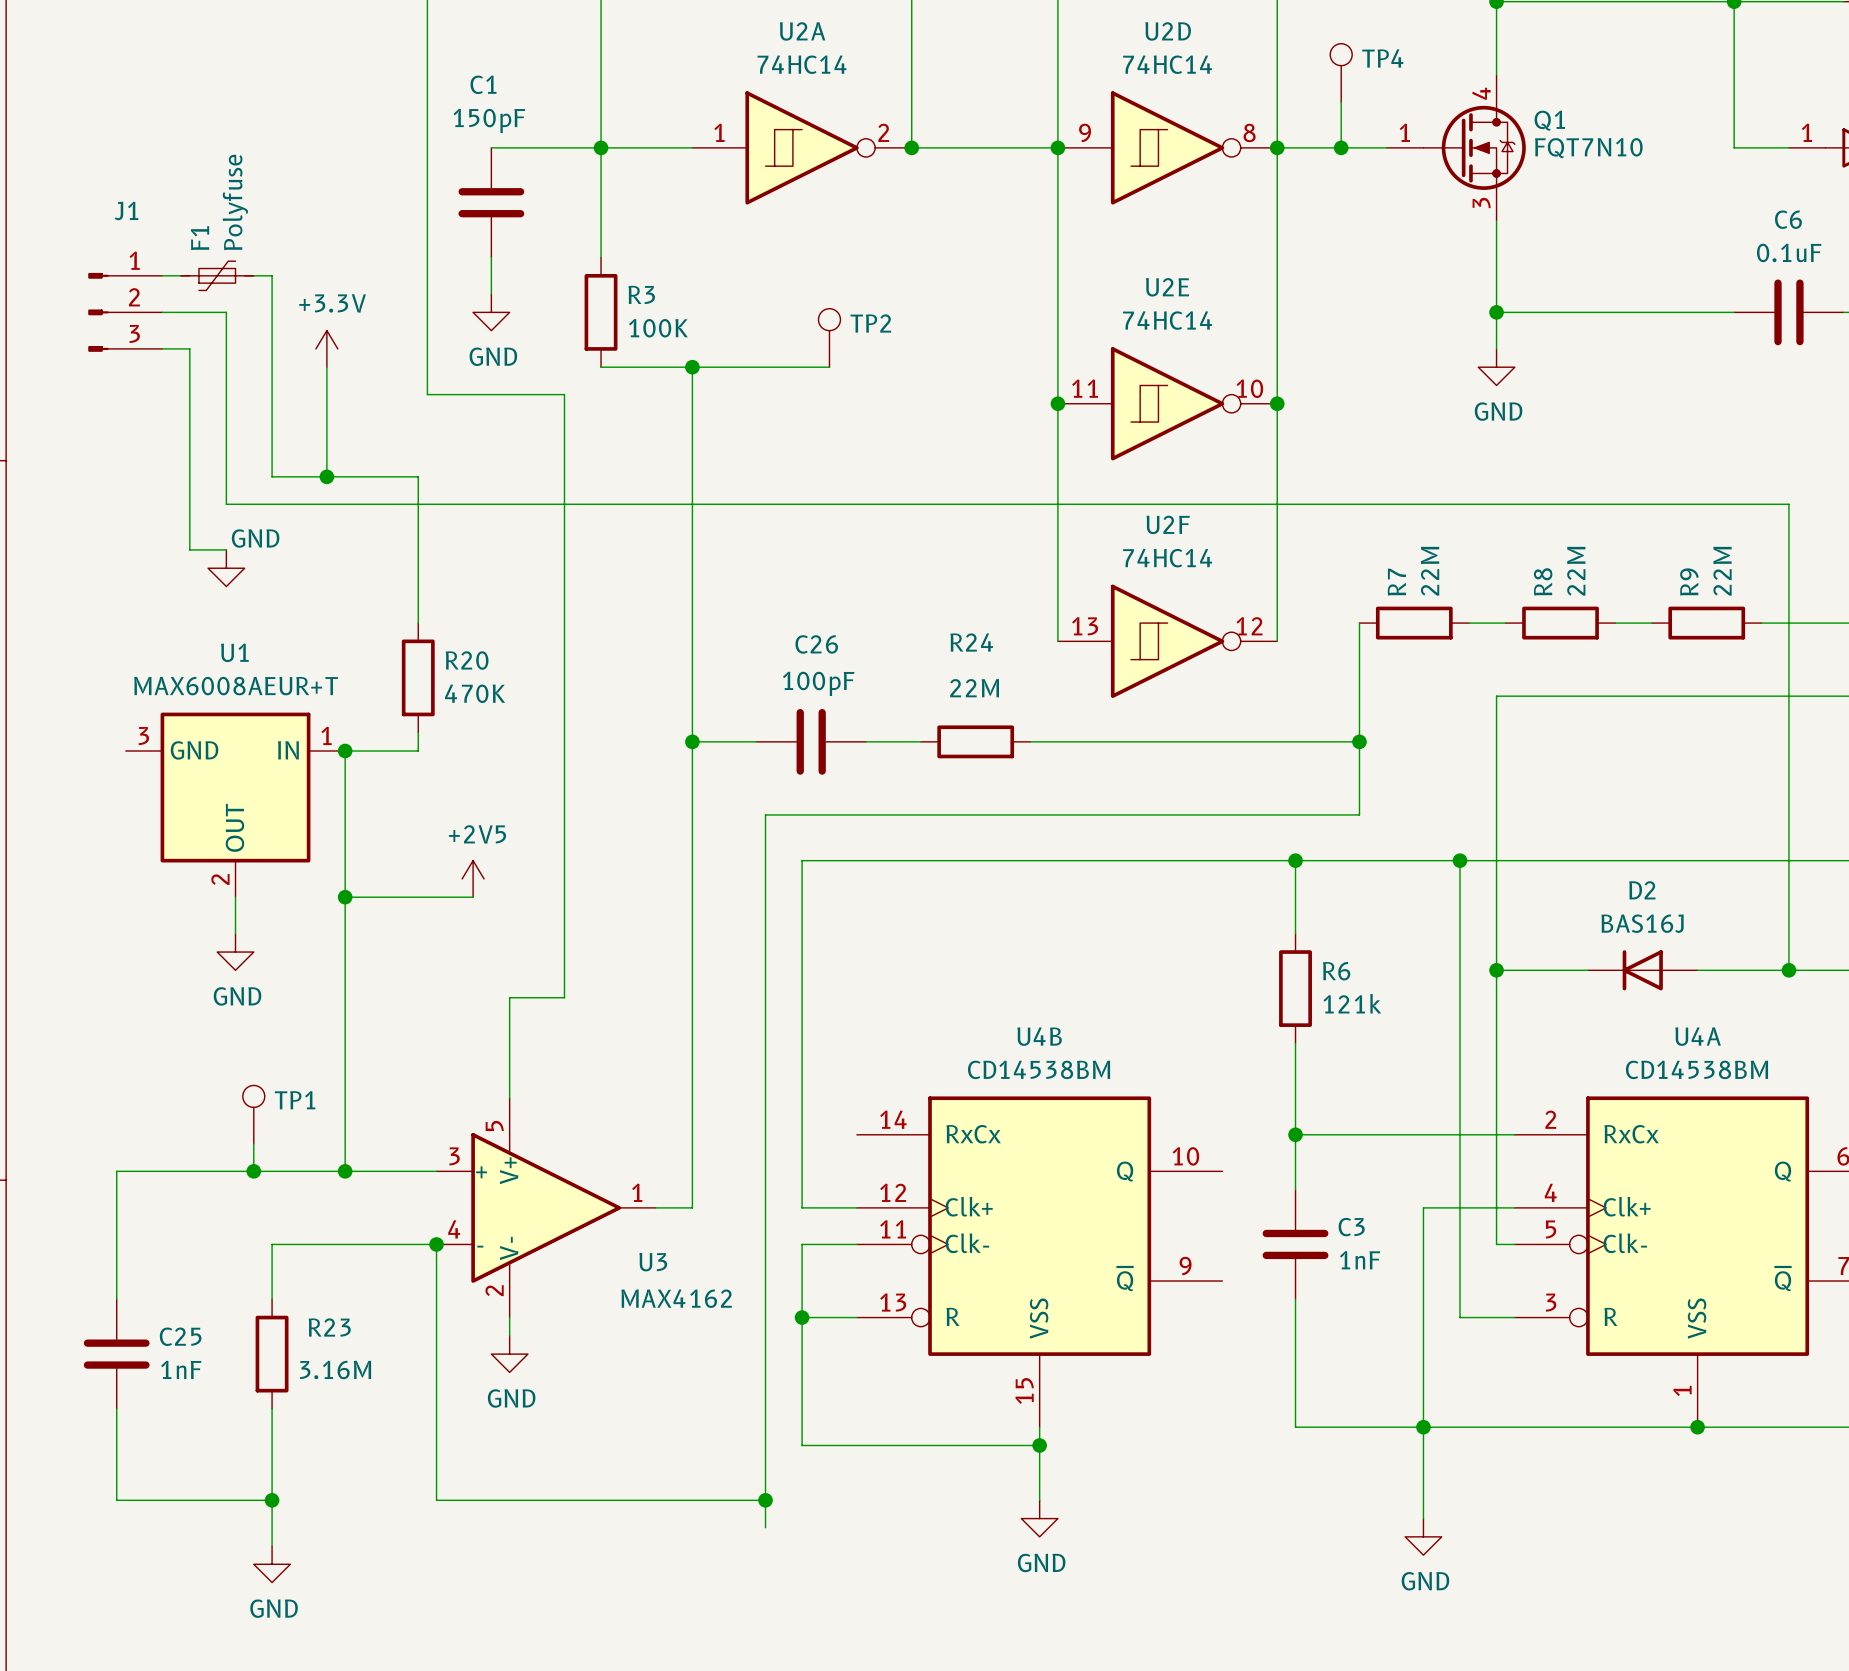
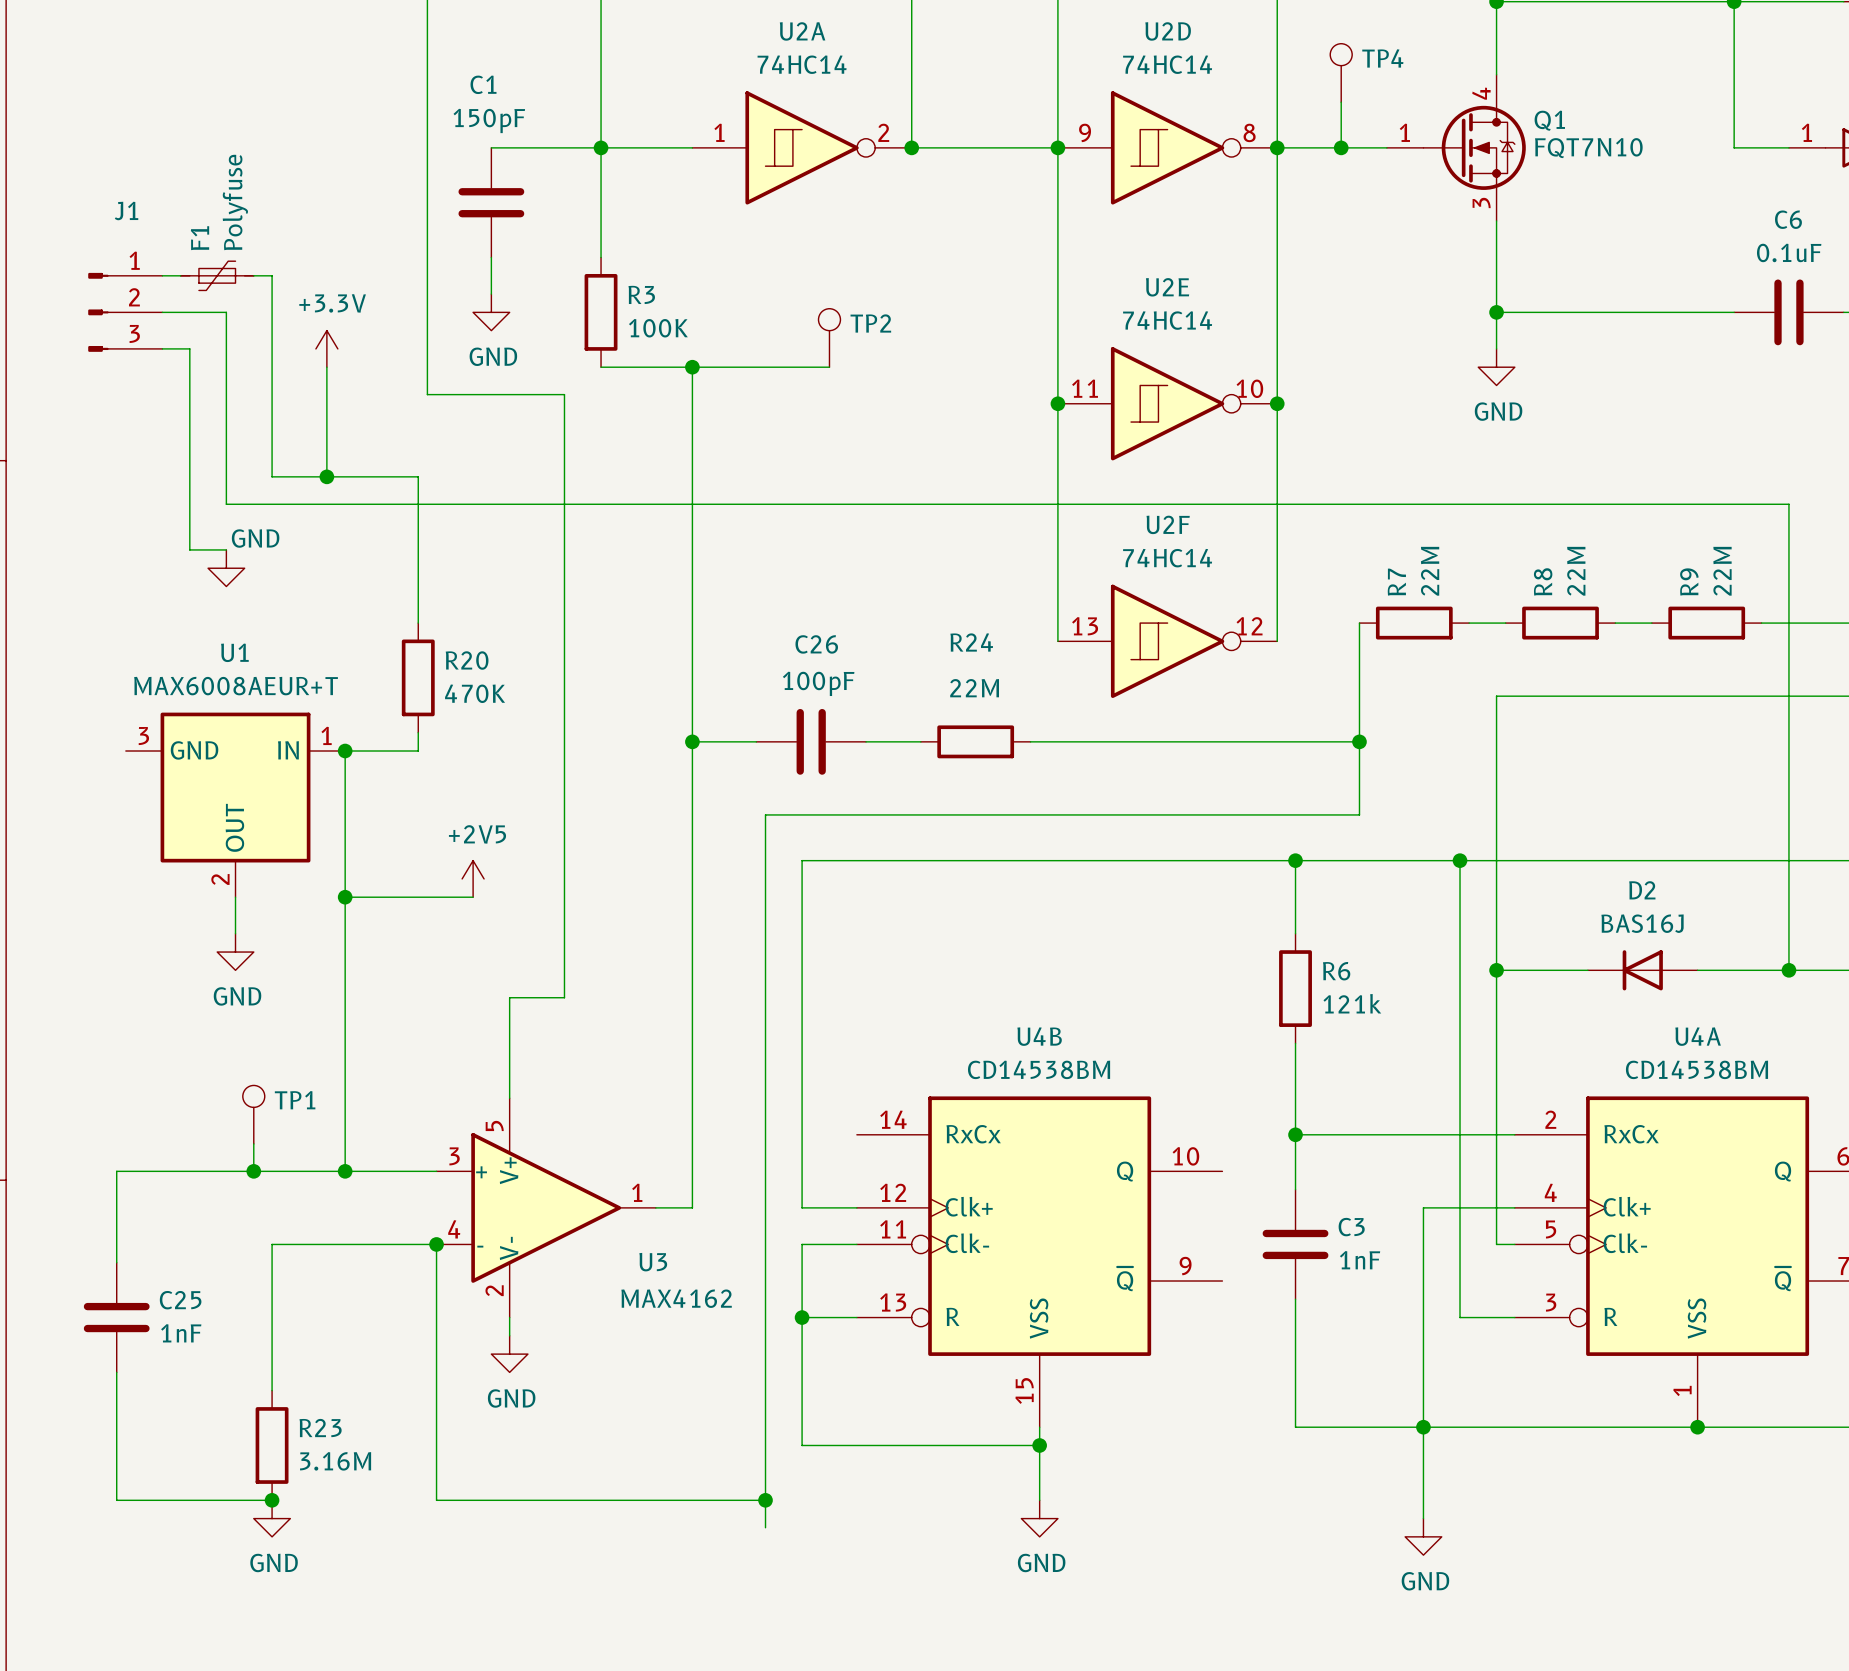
wire: none -> (272, 1299) (272, 1390)
R23 name position: R23 (329, 1327) -> R23 (320, 1428)
C25 position: (116, 1354) -> (116, 1317)
R23 position: (272, 1354) -> (272, 1445)
wire: (272, 1408) (272, 1546) -> none
power symbol position: GND (272, 1564) -> GND (272, 1518)

